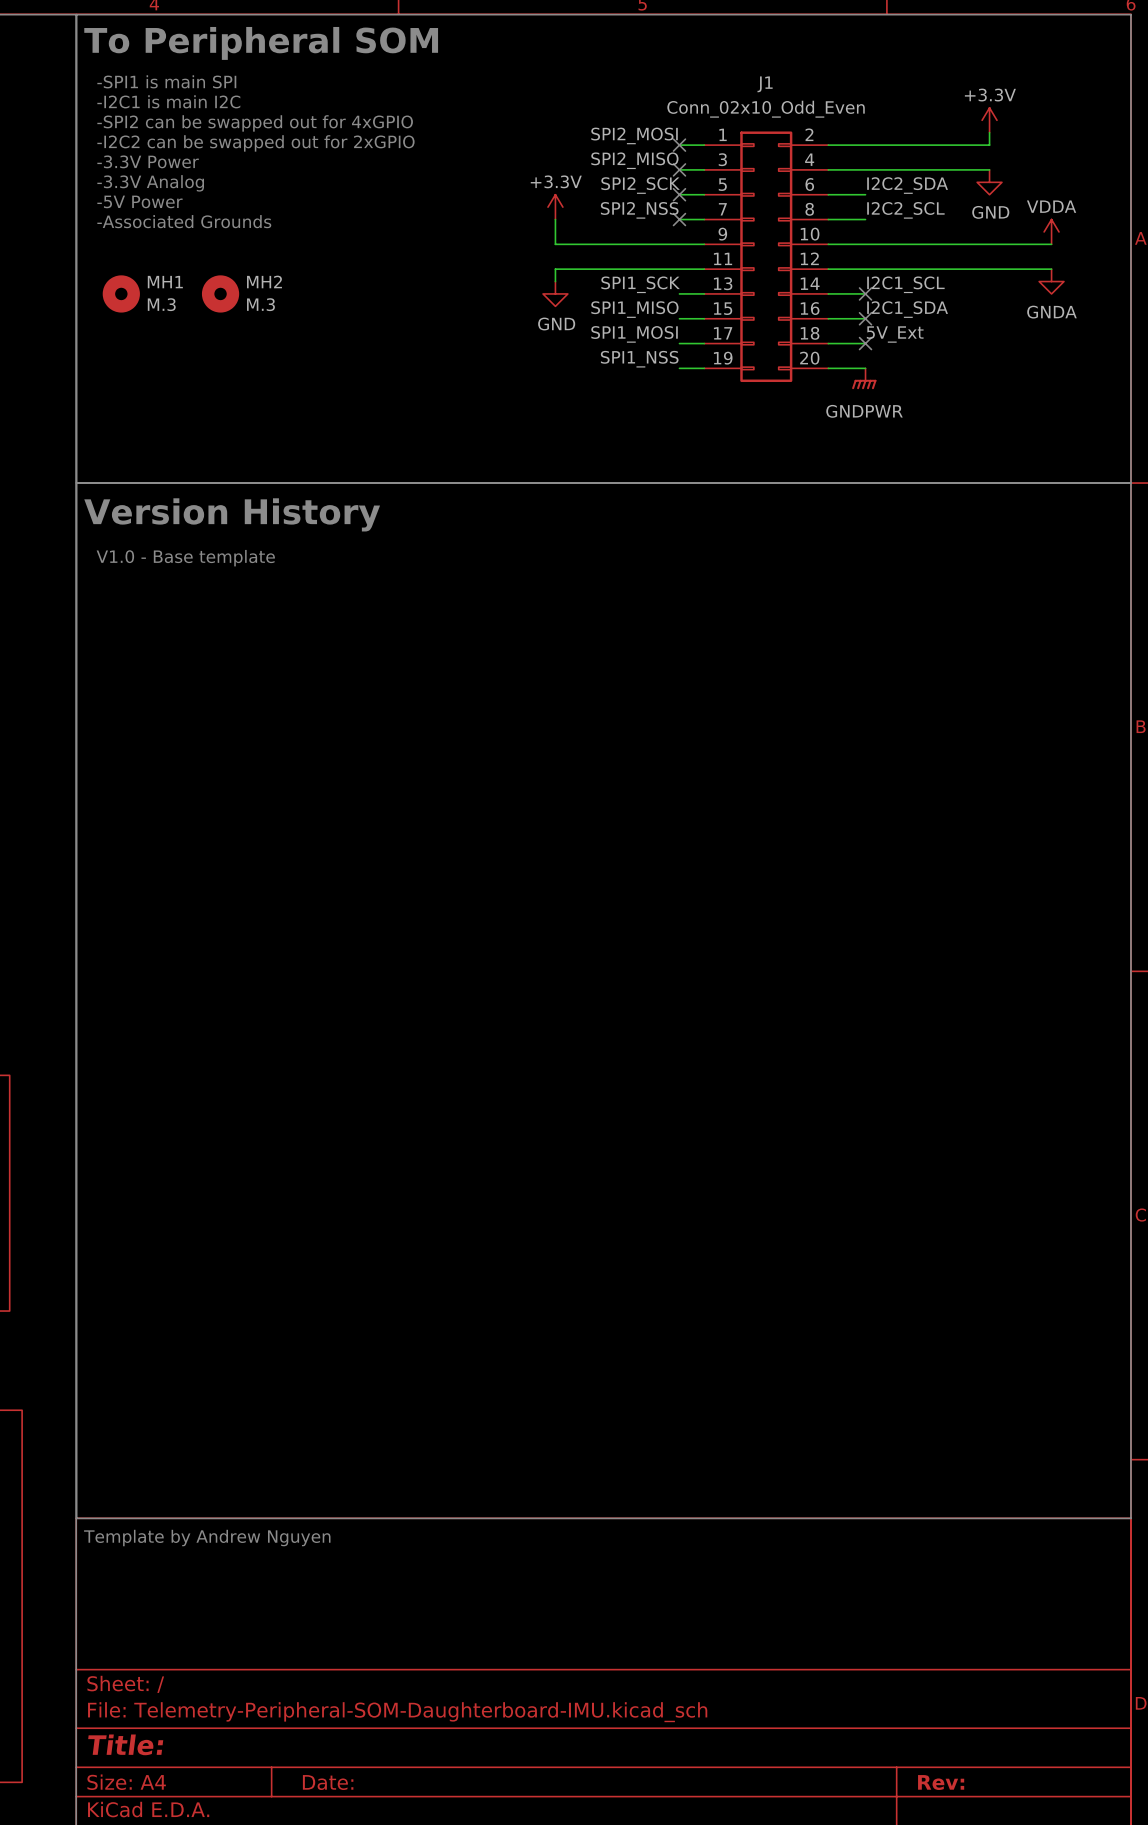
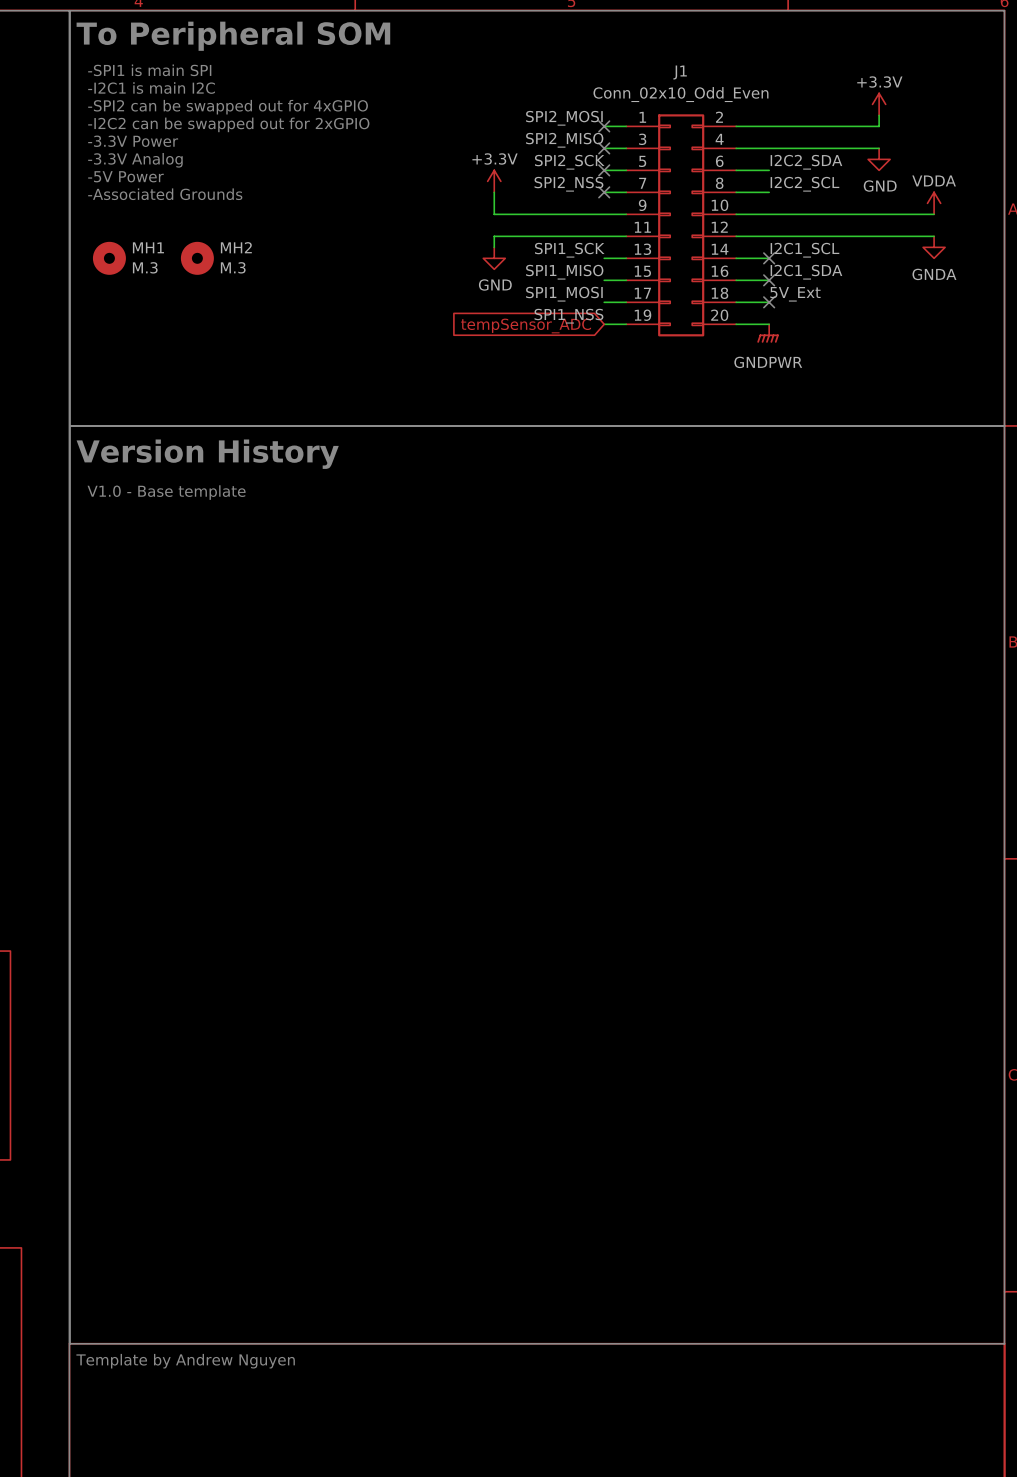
global label: none -> tempSensor_ADC (526, 325)

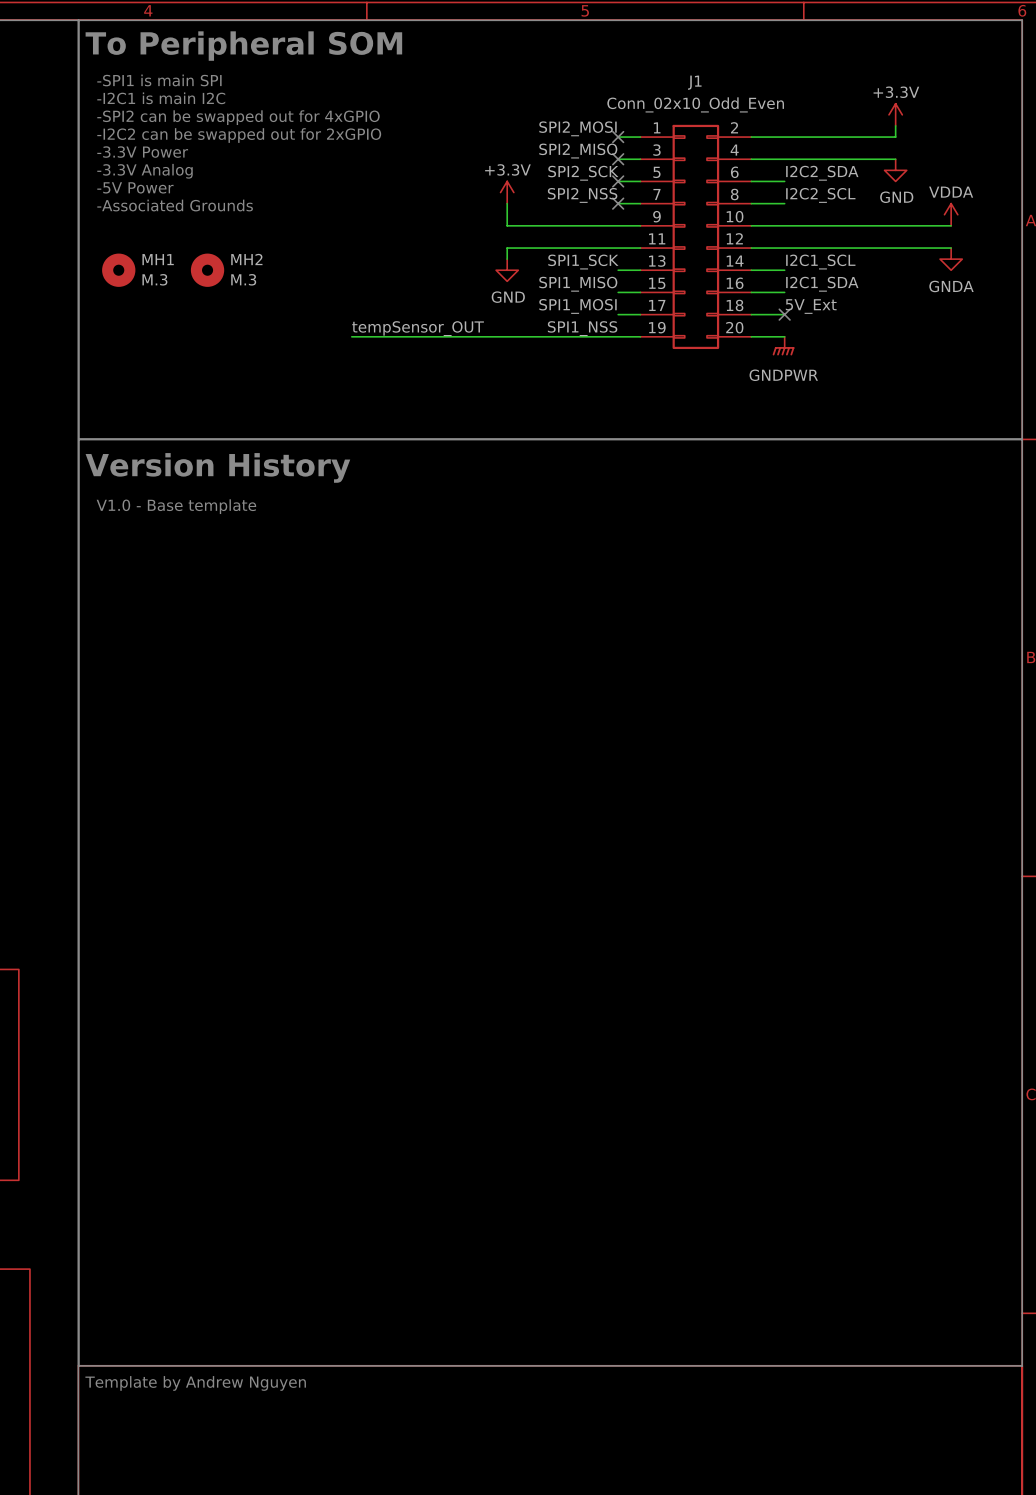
no-connect mark: (769, 258) -> none
no-connect mark: (769, 280) -> none
label: none -> tempSensor_OUT (418, 328)
wire: none -> (351, 336) (618, 336)
global label: tempSensor_ADC (526, 325) -> none

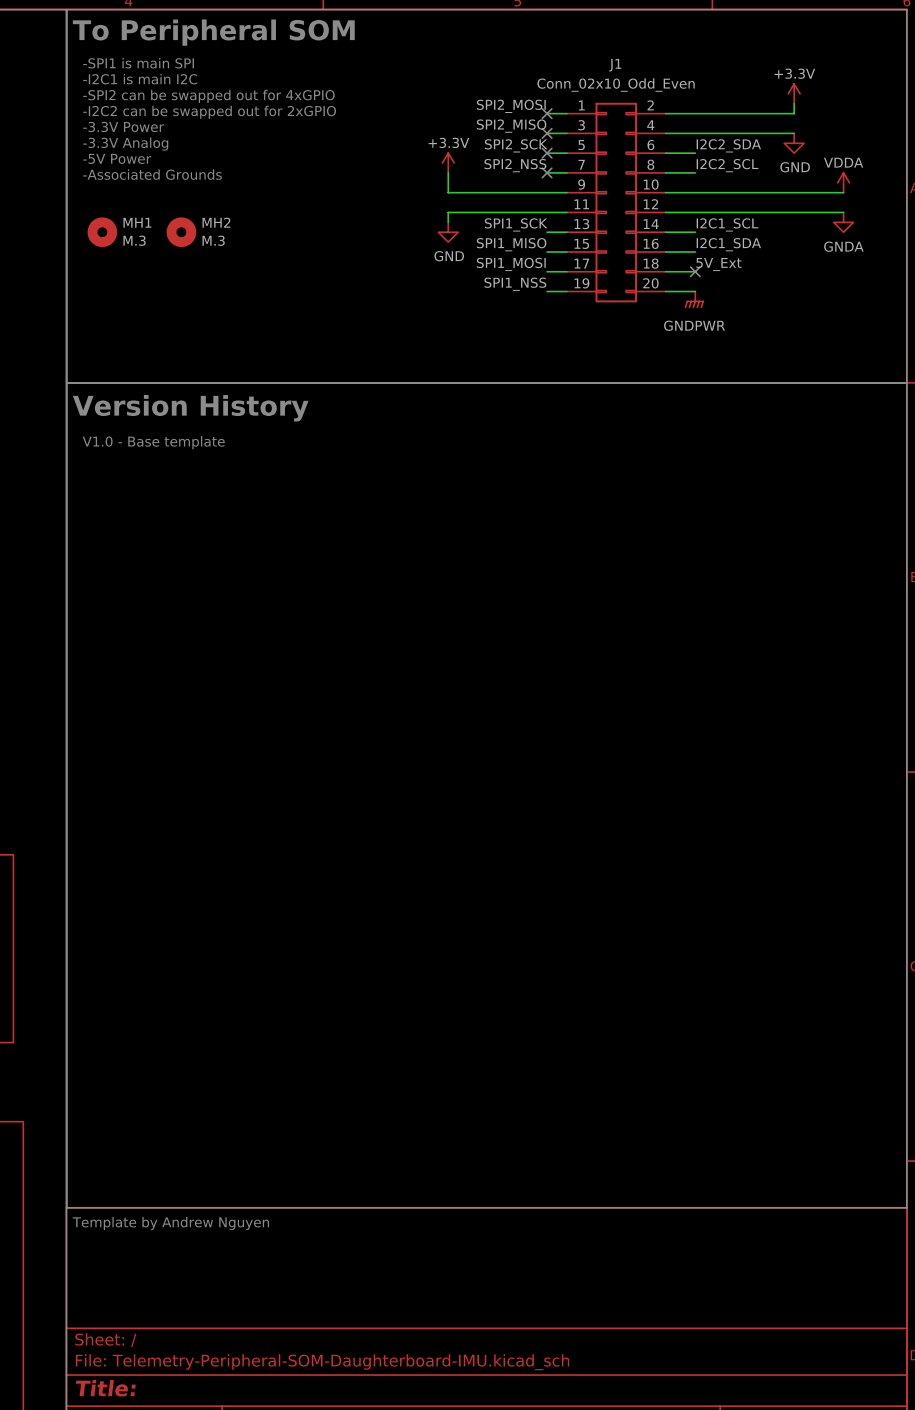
label: tempSensor_OUT (418, 328) -> none
wire: (351, 336) (618, 336) -> none

